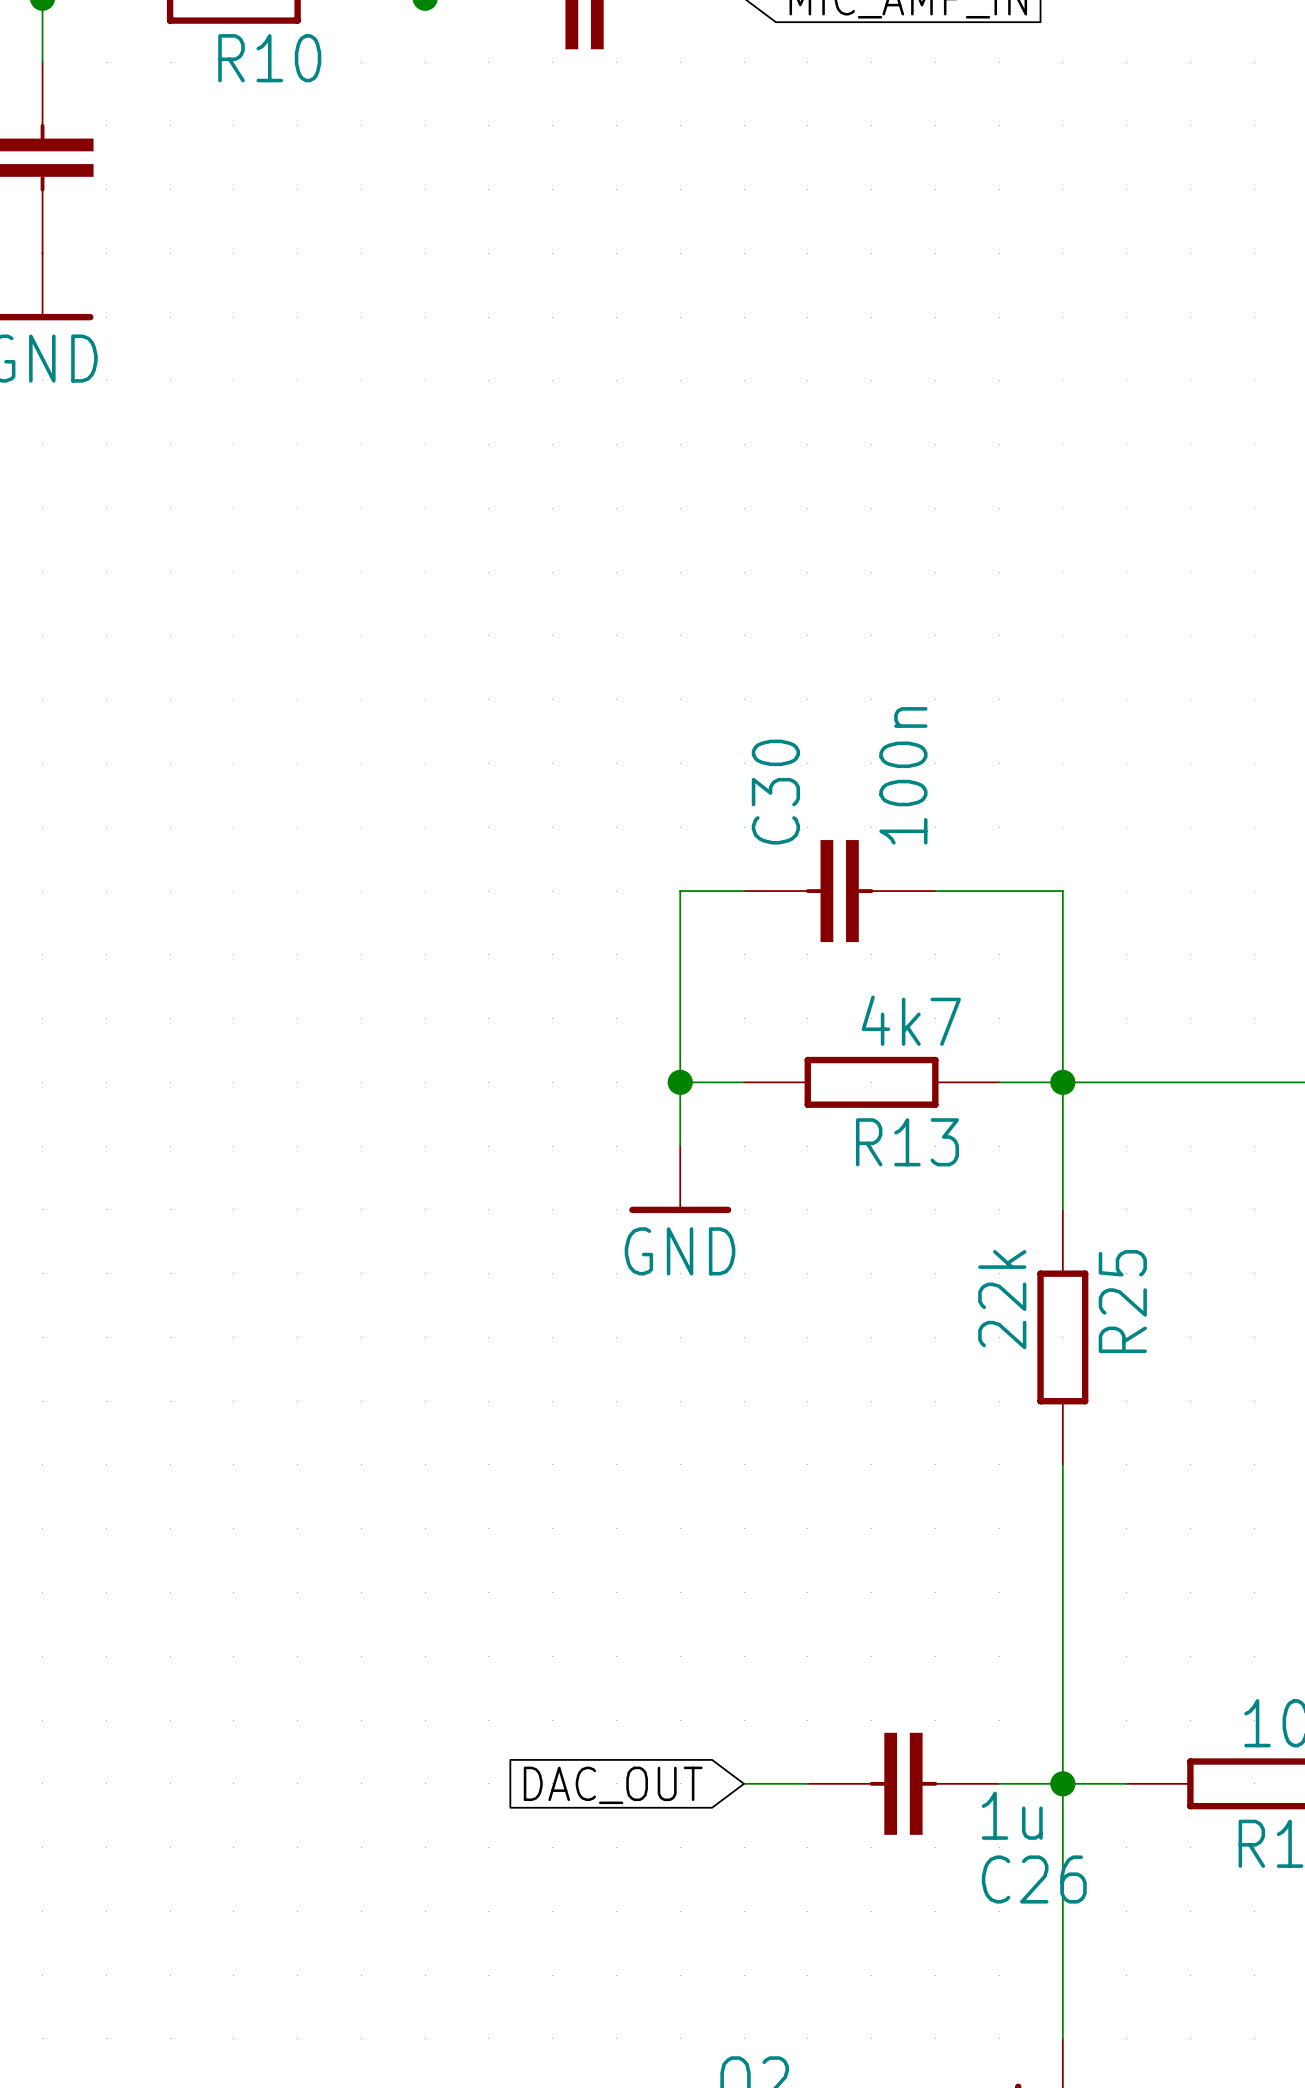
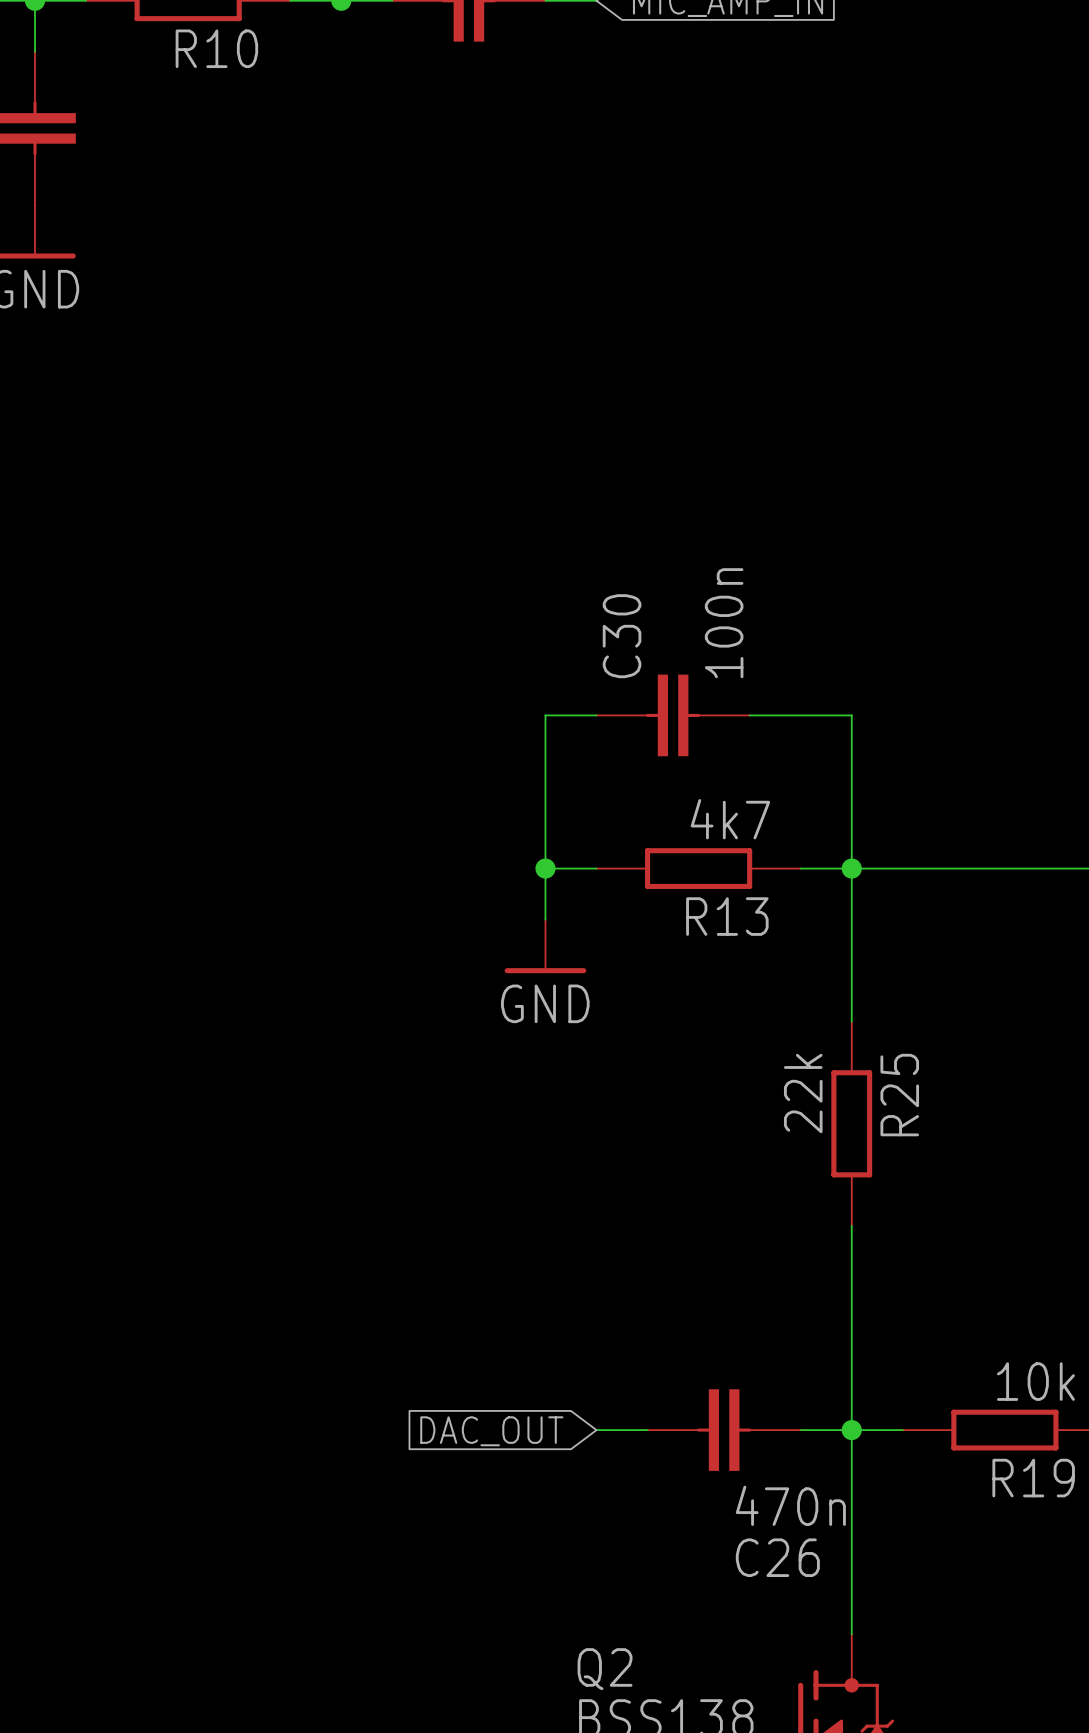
R25 position: (1062, 1337) -> (851, 1123)
C26 value: 1u (1012, 1815) -> 470n (790, 1505)
C26 name position: C26 (1034, 1879) -> C26 (777, 1557)

